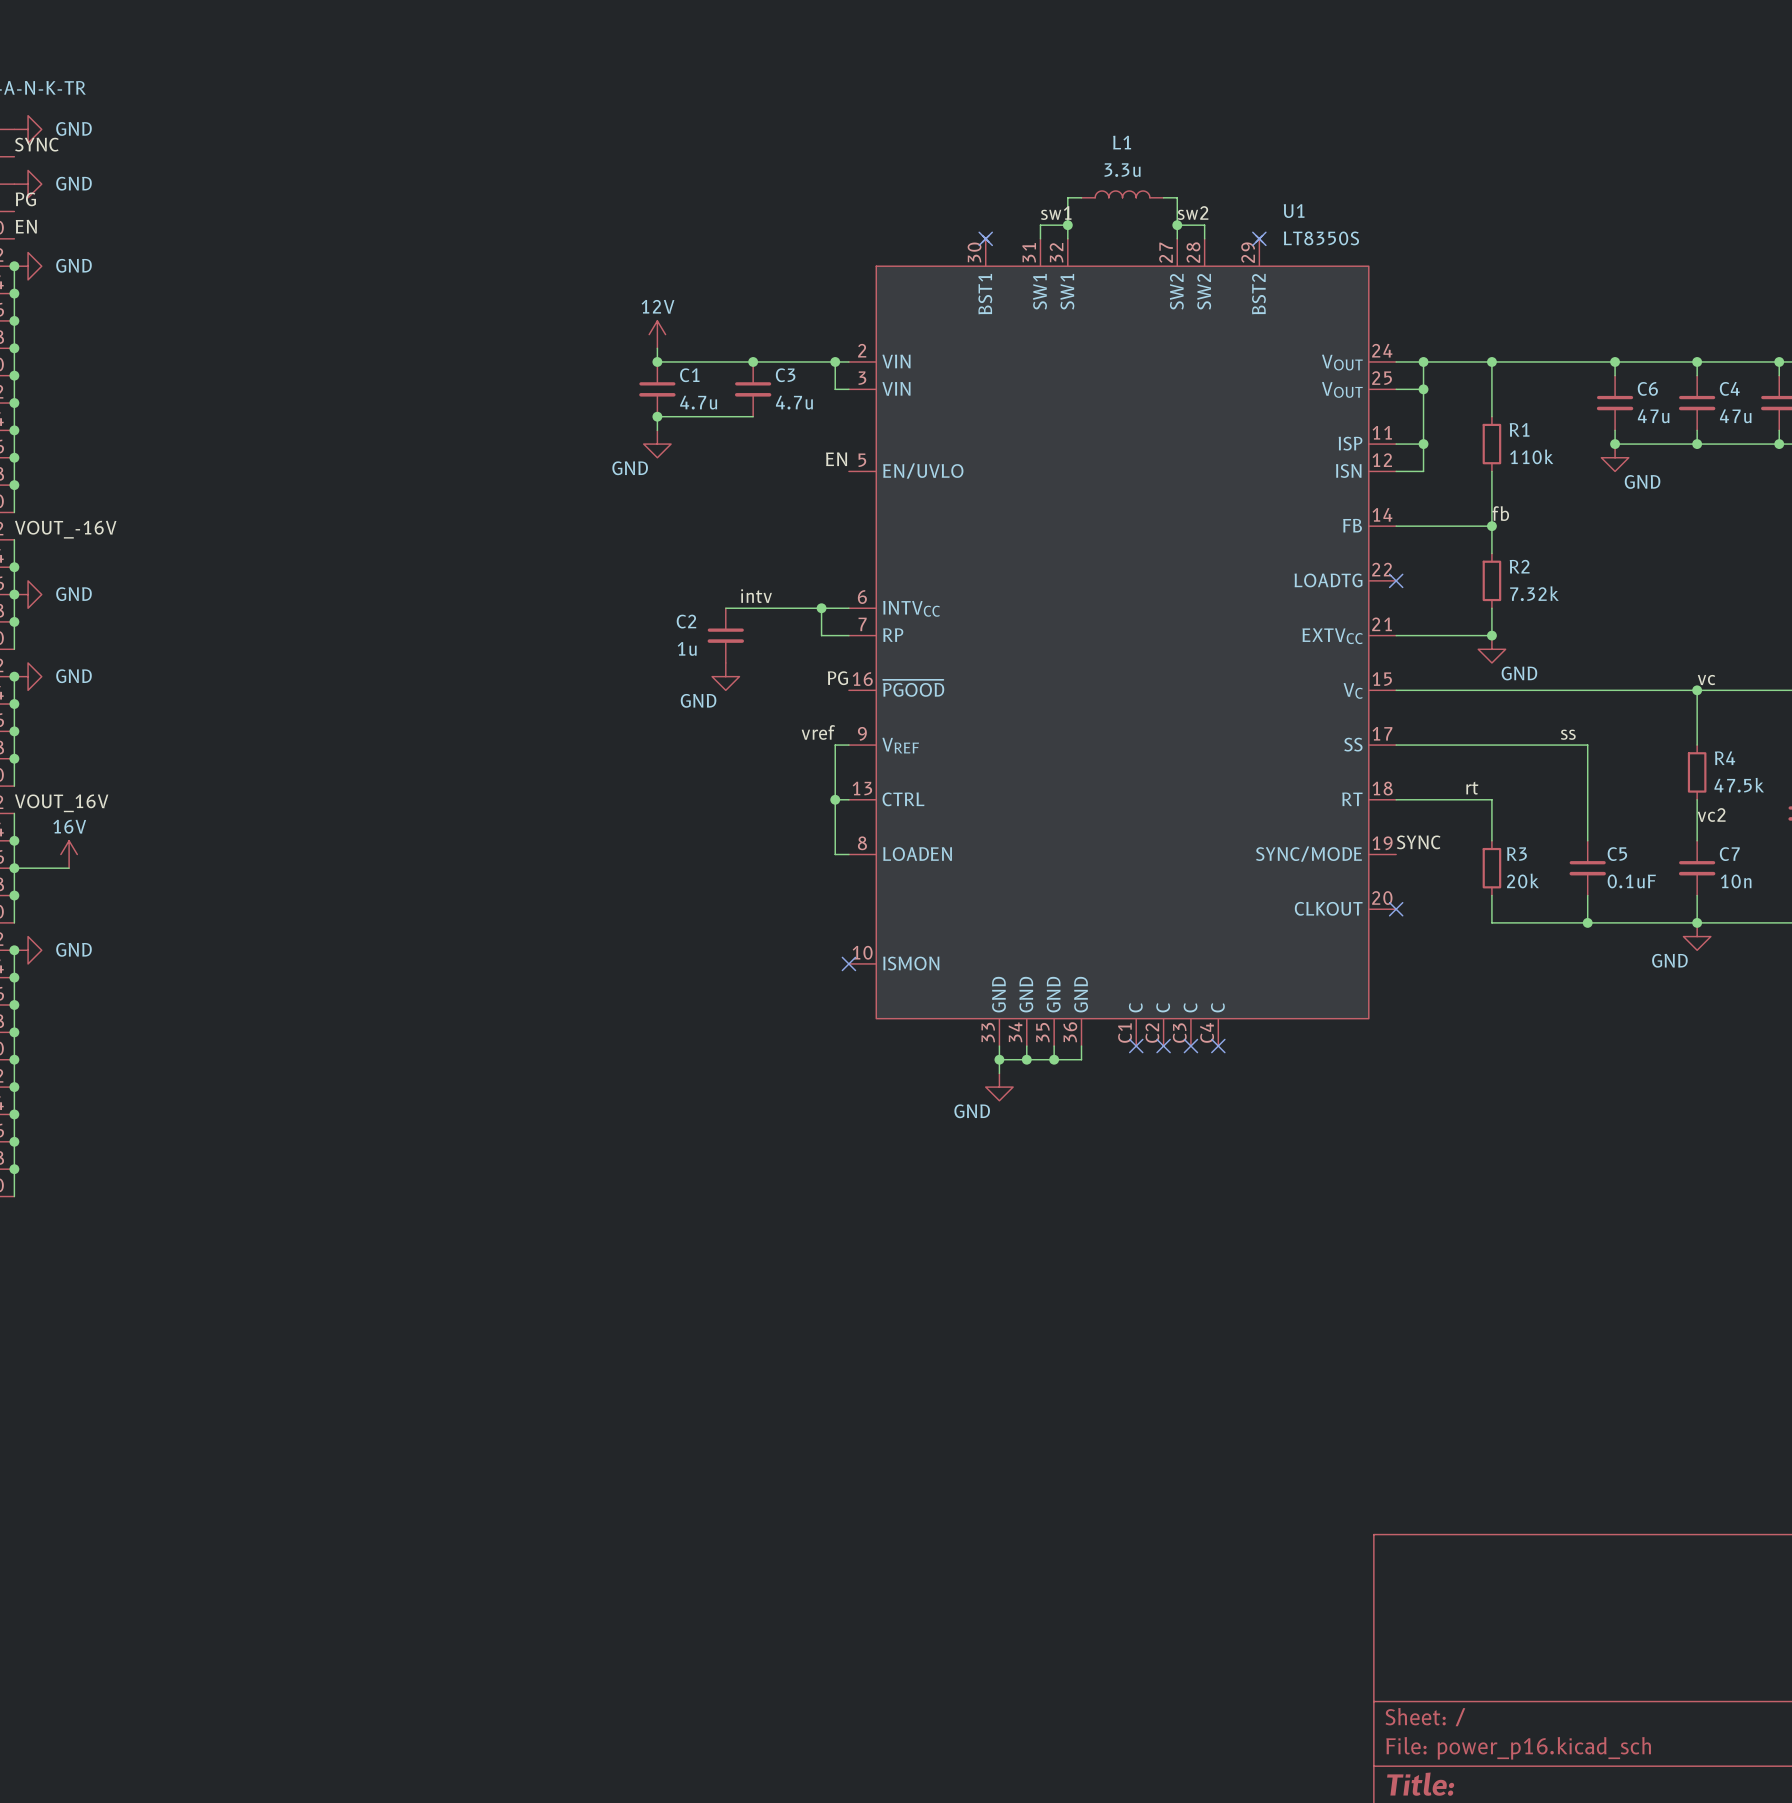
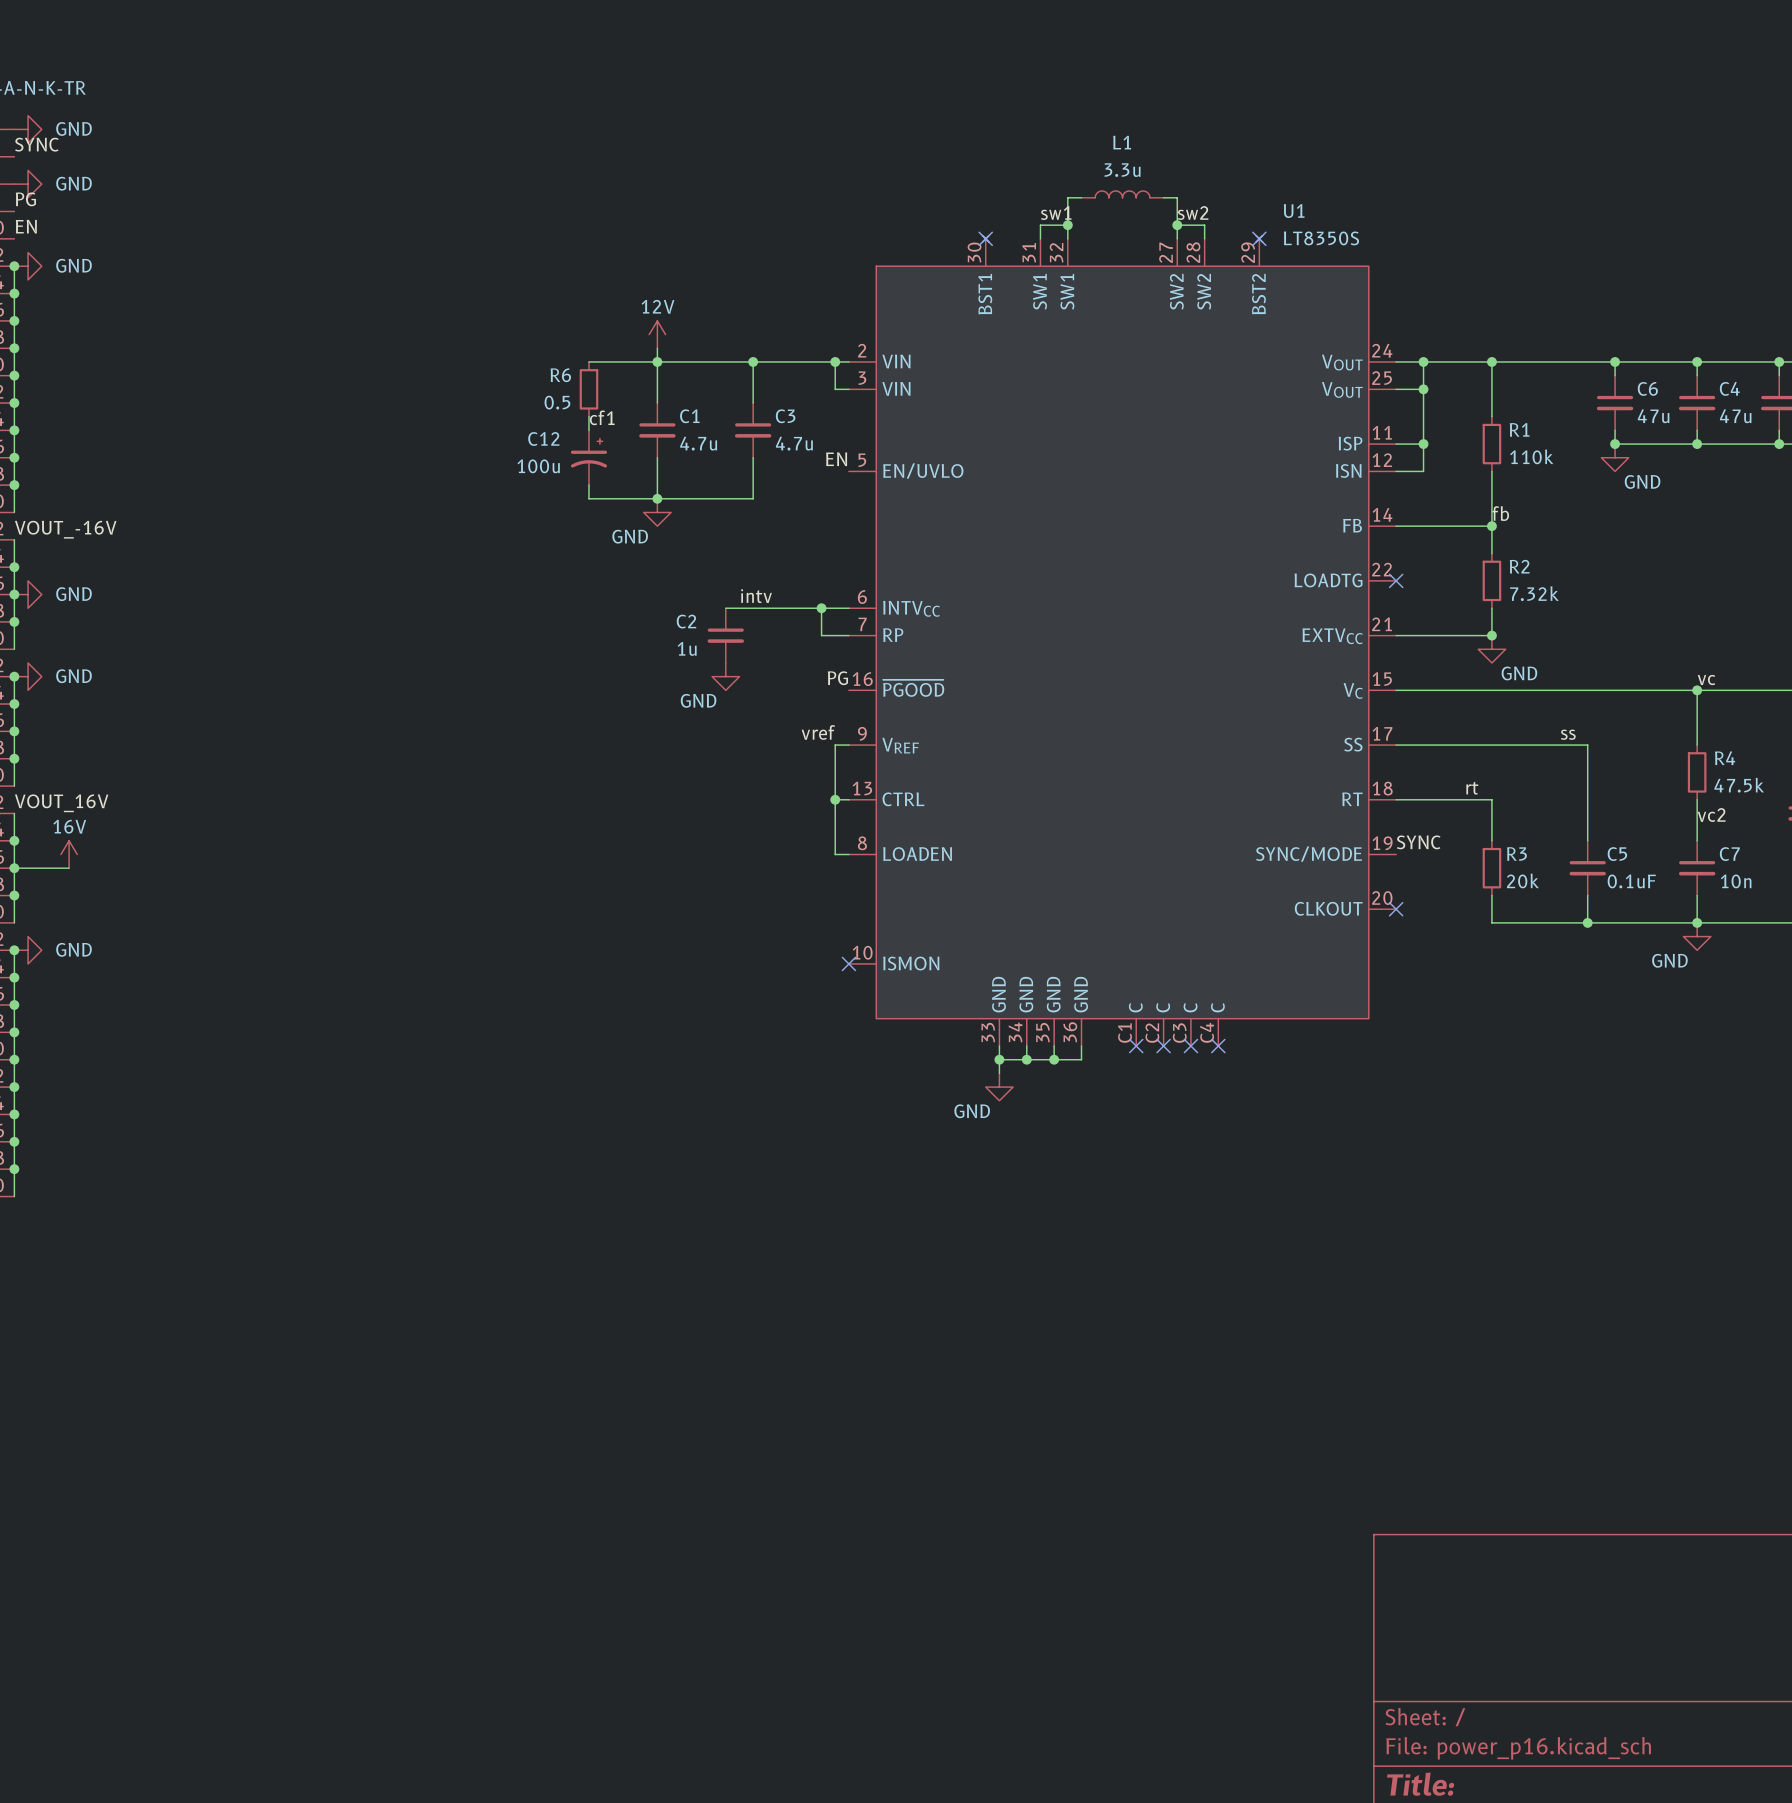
wire: none -> (588, 361) (657, 361) (657, 403)
R6: none -> 0.5 (588, 389)
C1 position: (657, 389) -> (657, 430)
C3 position: (753, 389) -> (753, 430)
wire: none -> (588, 416) (588, 430)
junction: (657, 416) -> none
wire: (753, 416) (657, 416) (657, 430) -> none
label: none -> cf1 (602, 417)
power symbol position: GND (657, 444) -> GND (657, 512)
C12: none -> 100u (588, 457)
wire: none -> (657, 457) (657, 498)
wire: none -> (753, 457) (753, 498) (588, 498) (588, 485)
junction: none -> (657, 498)

